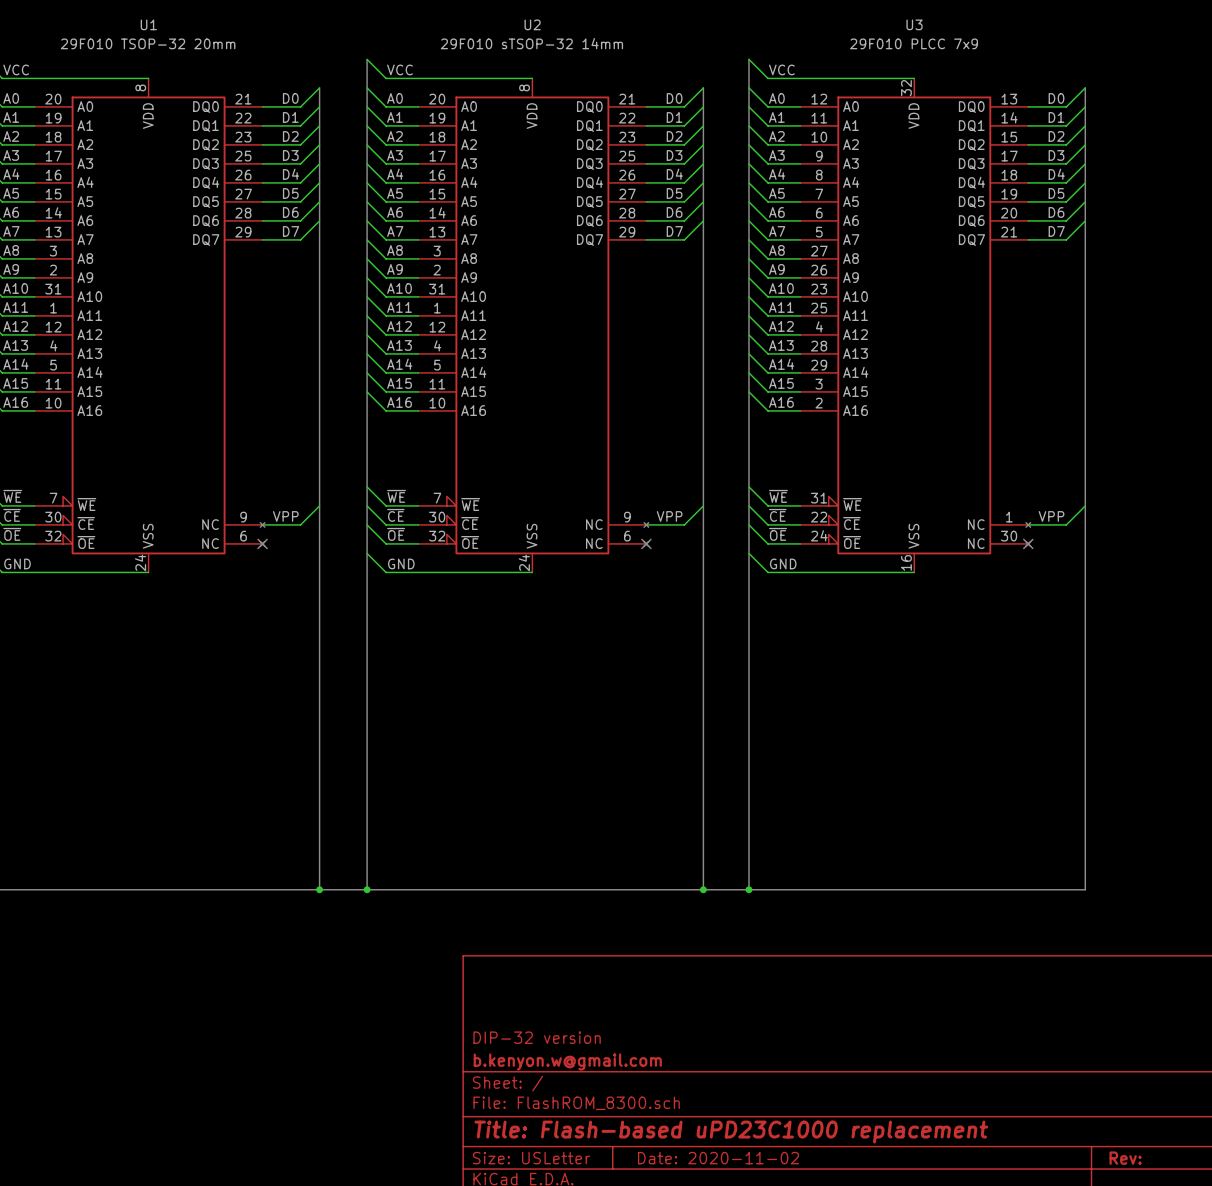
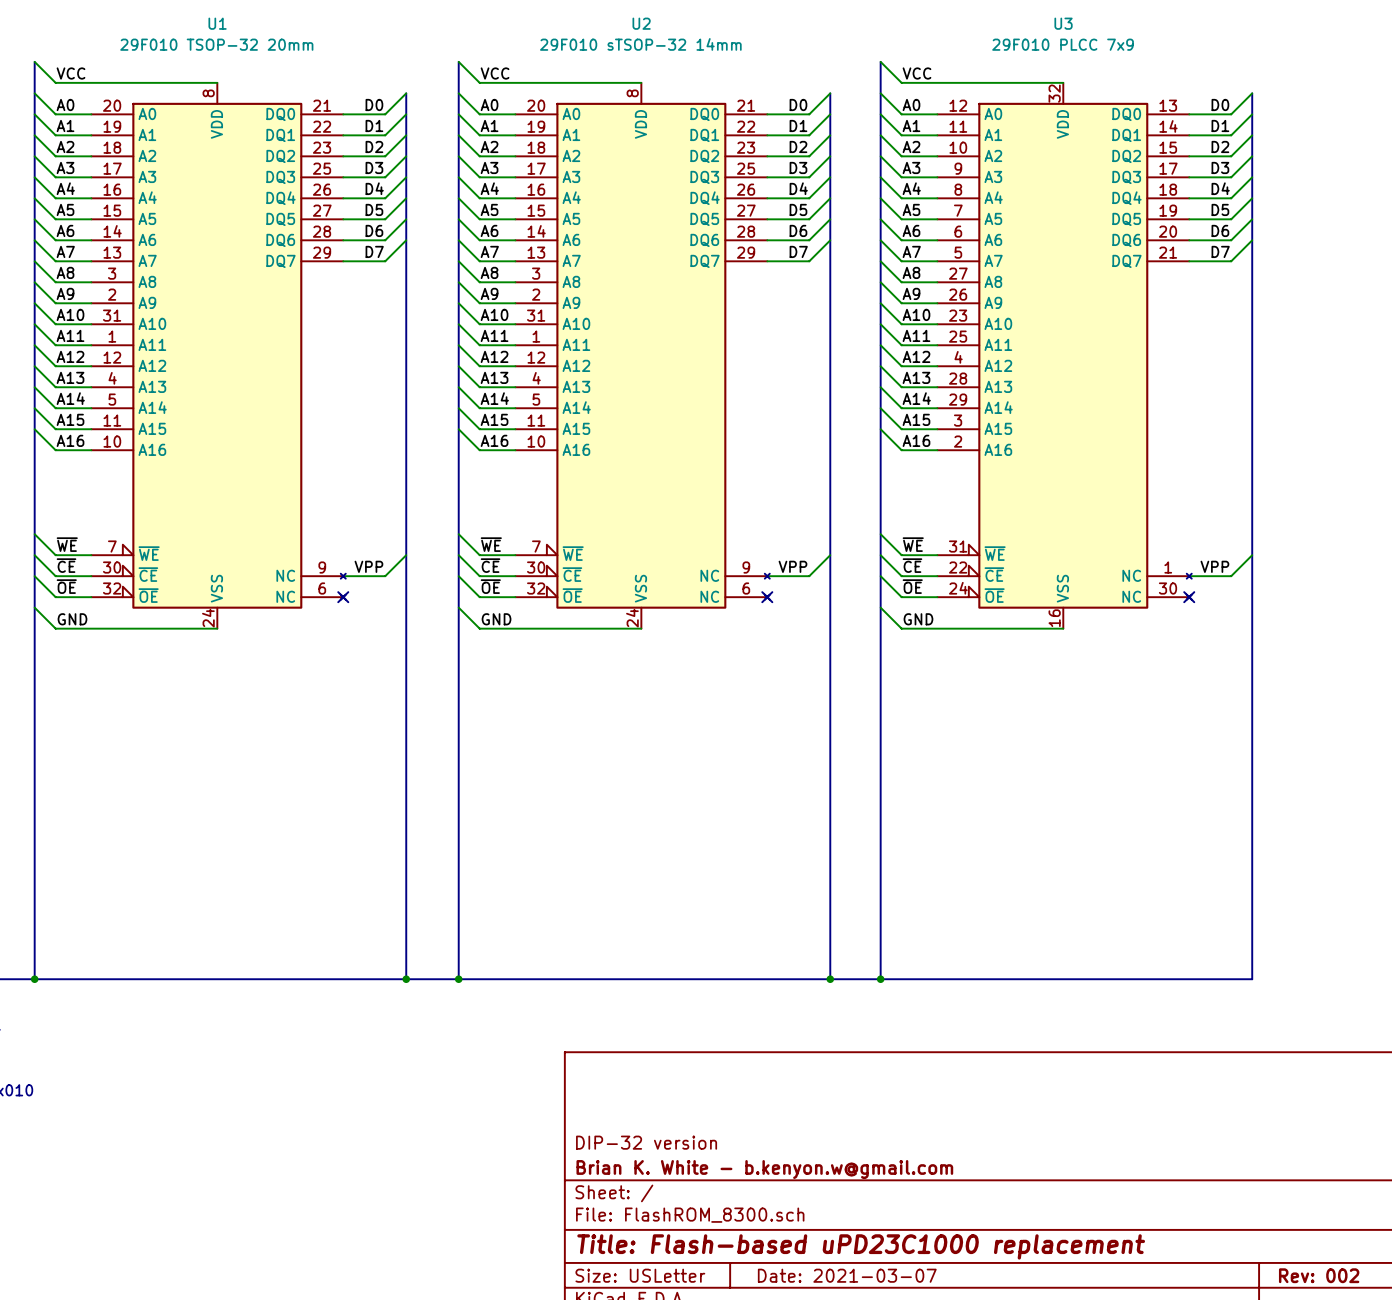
title block: b.kenyon.w@gmail.com (567, 1062) -> Brian K. White - b.kenyon.w@gmail.com (764, 1169)
title block: Date: 2020-11-02 (718, 1158) -> Date: 2021-03-07 (847, 1275)
title block: Rev: (1125, 1158) -> Rev: 002 (1319, 1275)

